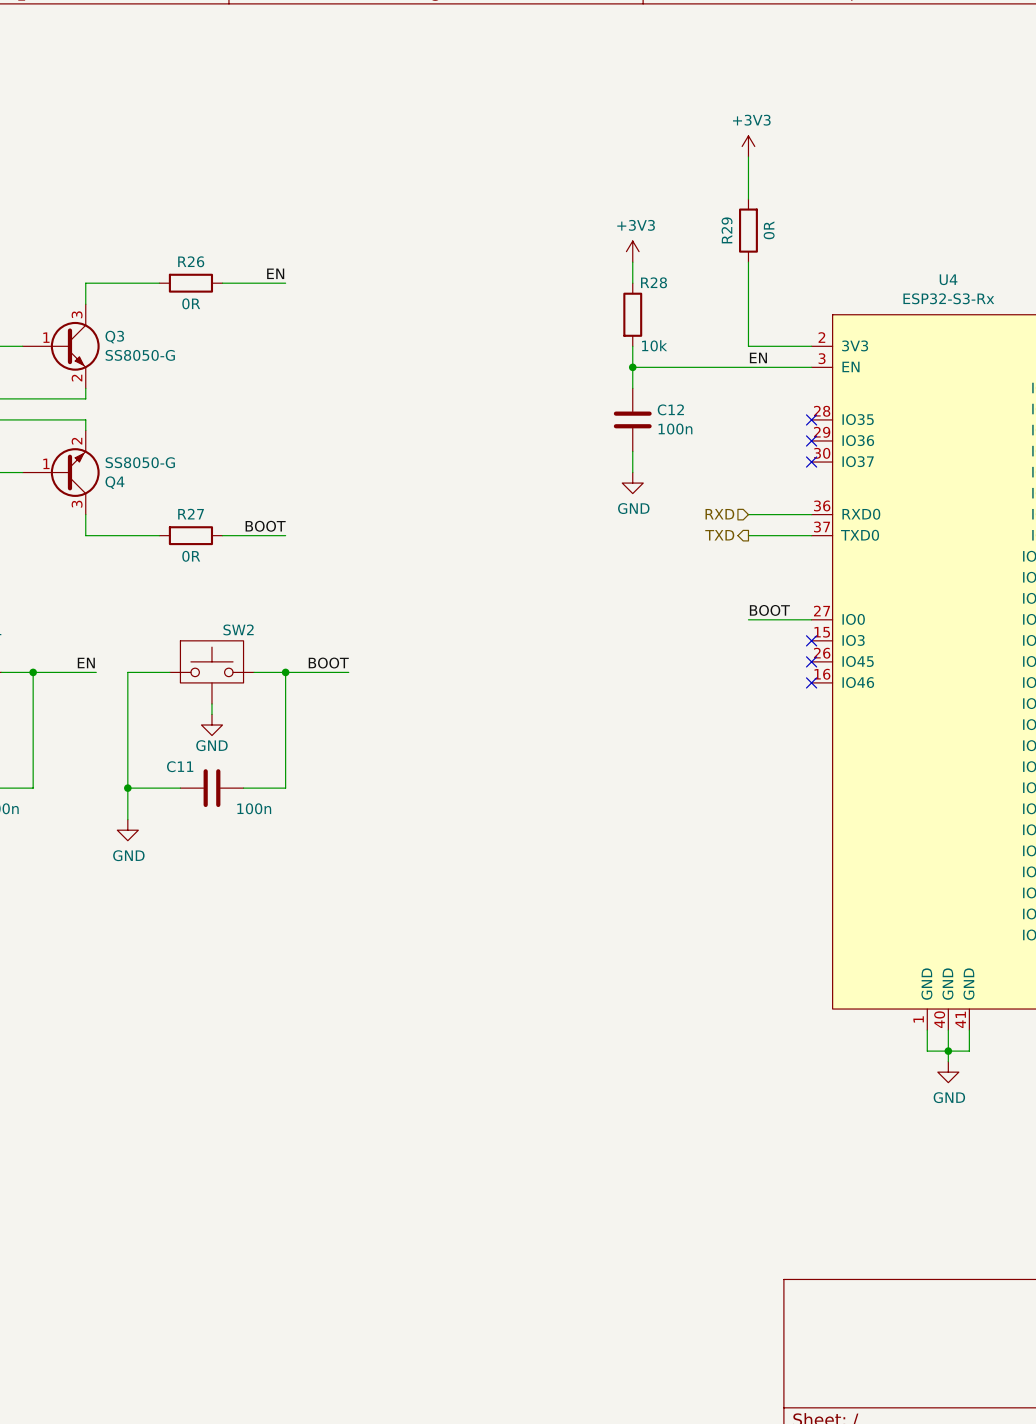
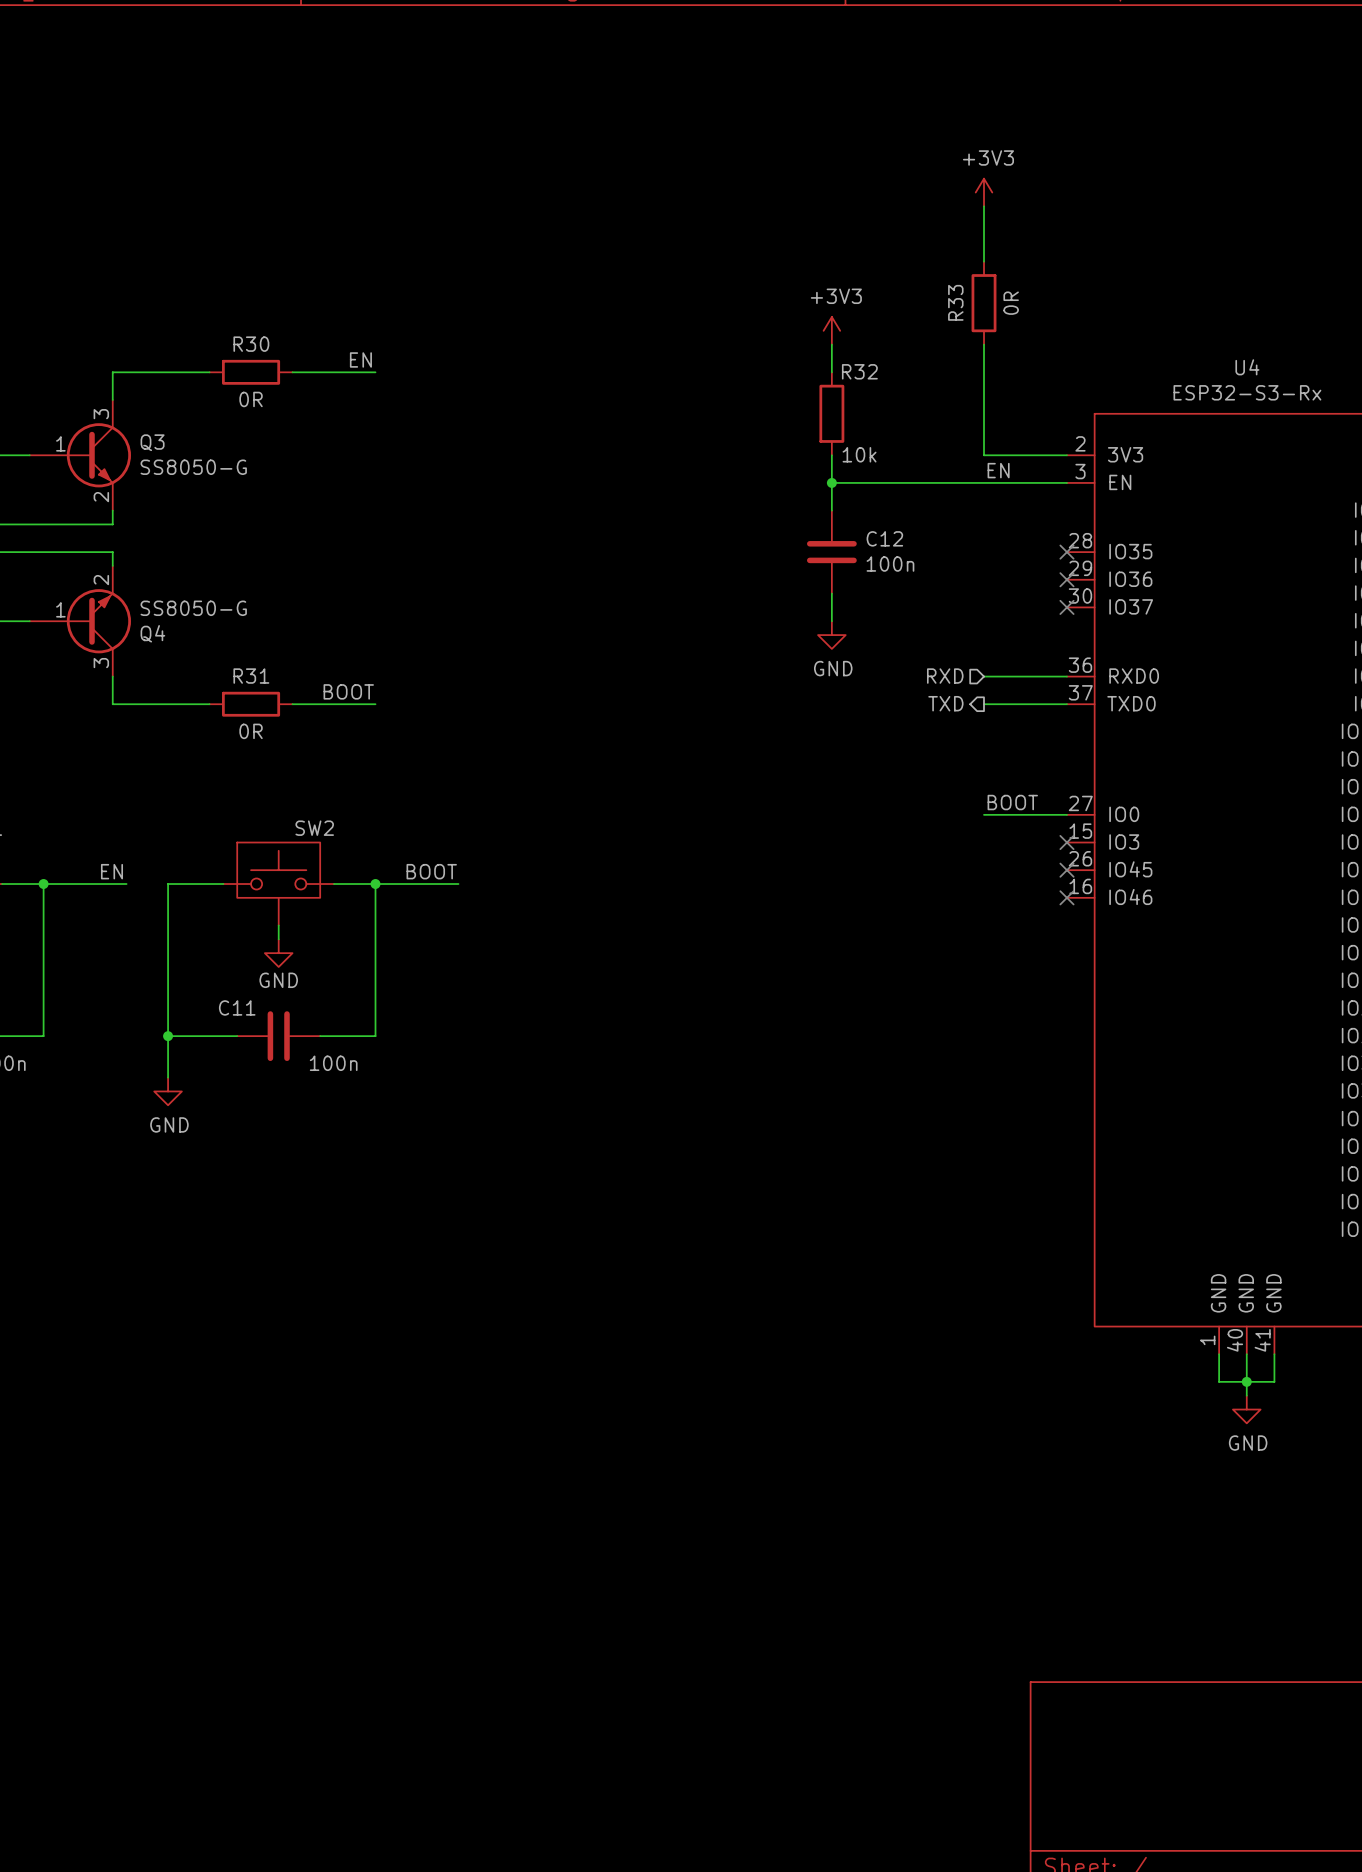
R29 name: R29 (727, 230) -> R33 (955, 302)
R26 name: R26 (191, 261) -> R30 (251, 344)
R28 name: R28 (654, 282) -> R32 (859, 371)
R27 name: R27 (191, 514) -> R31 (251, 676)

